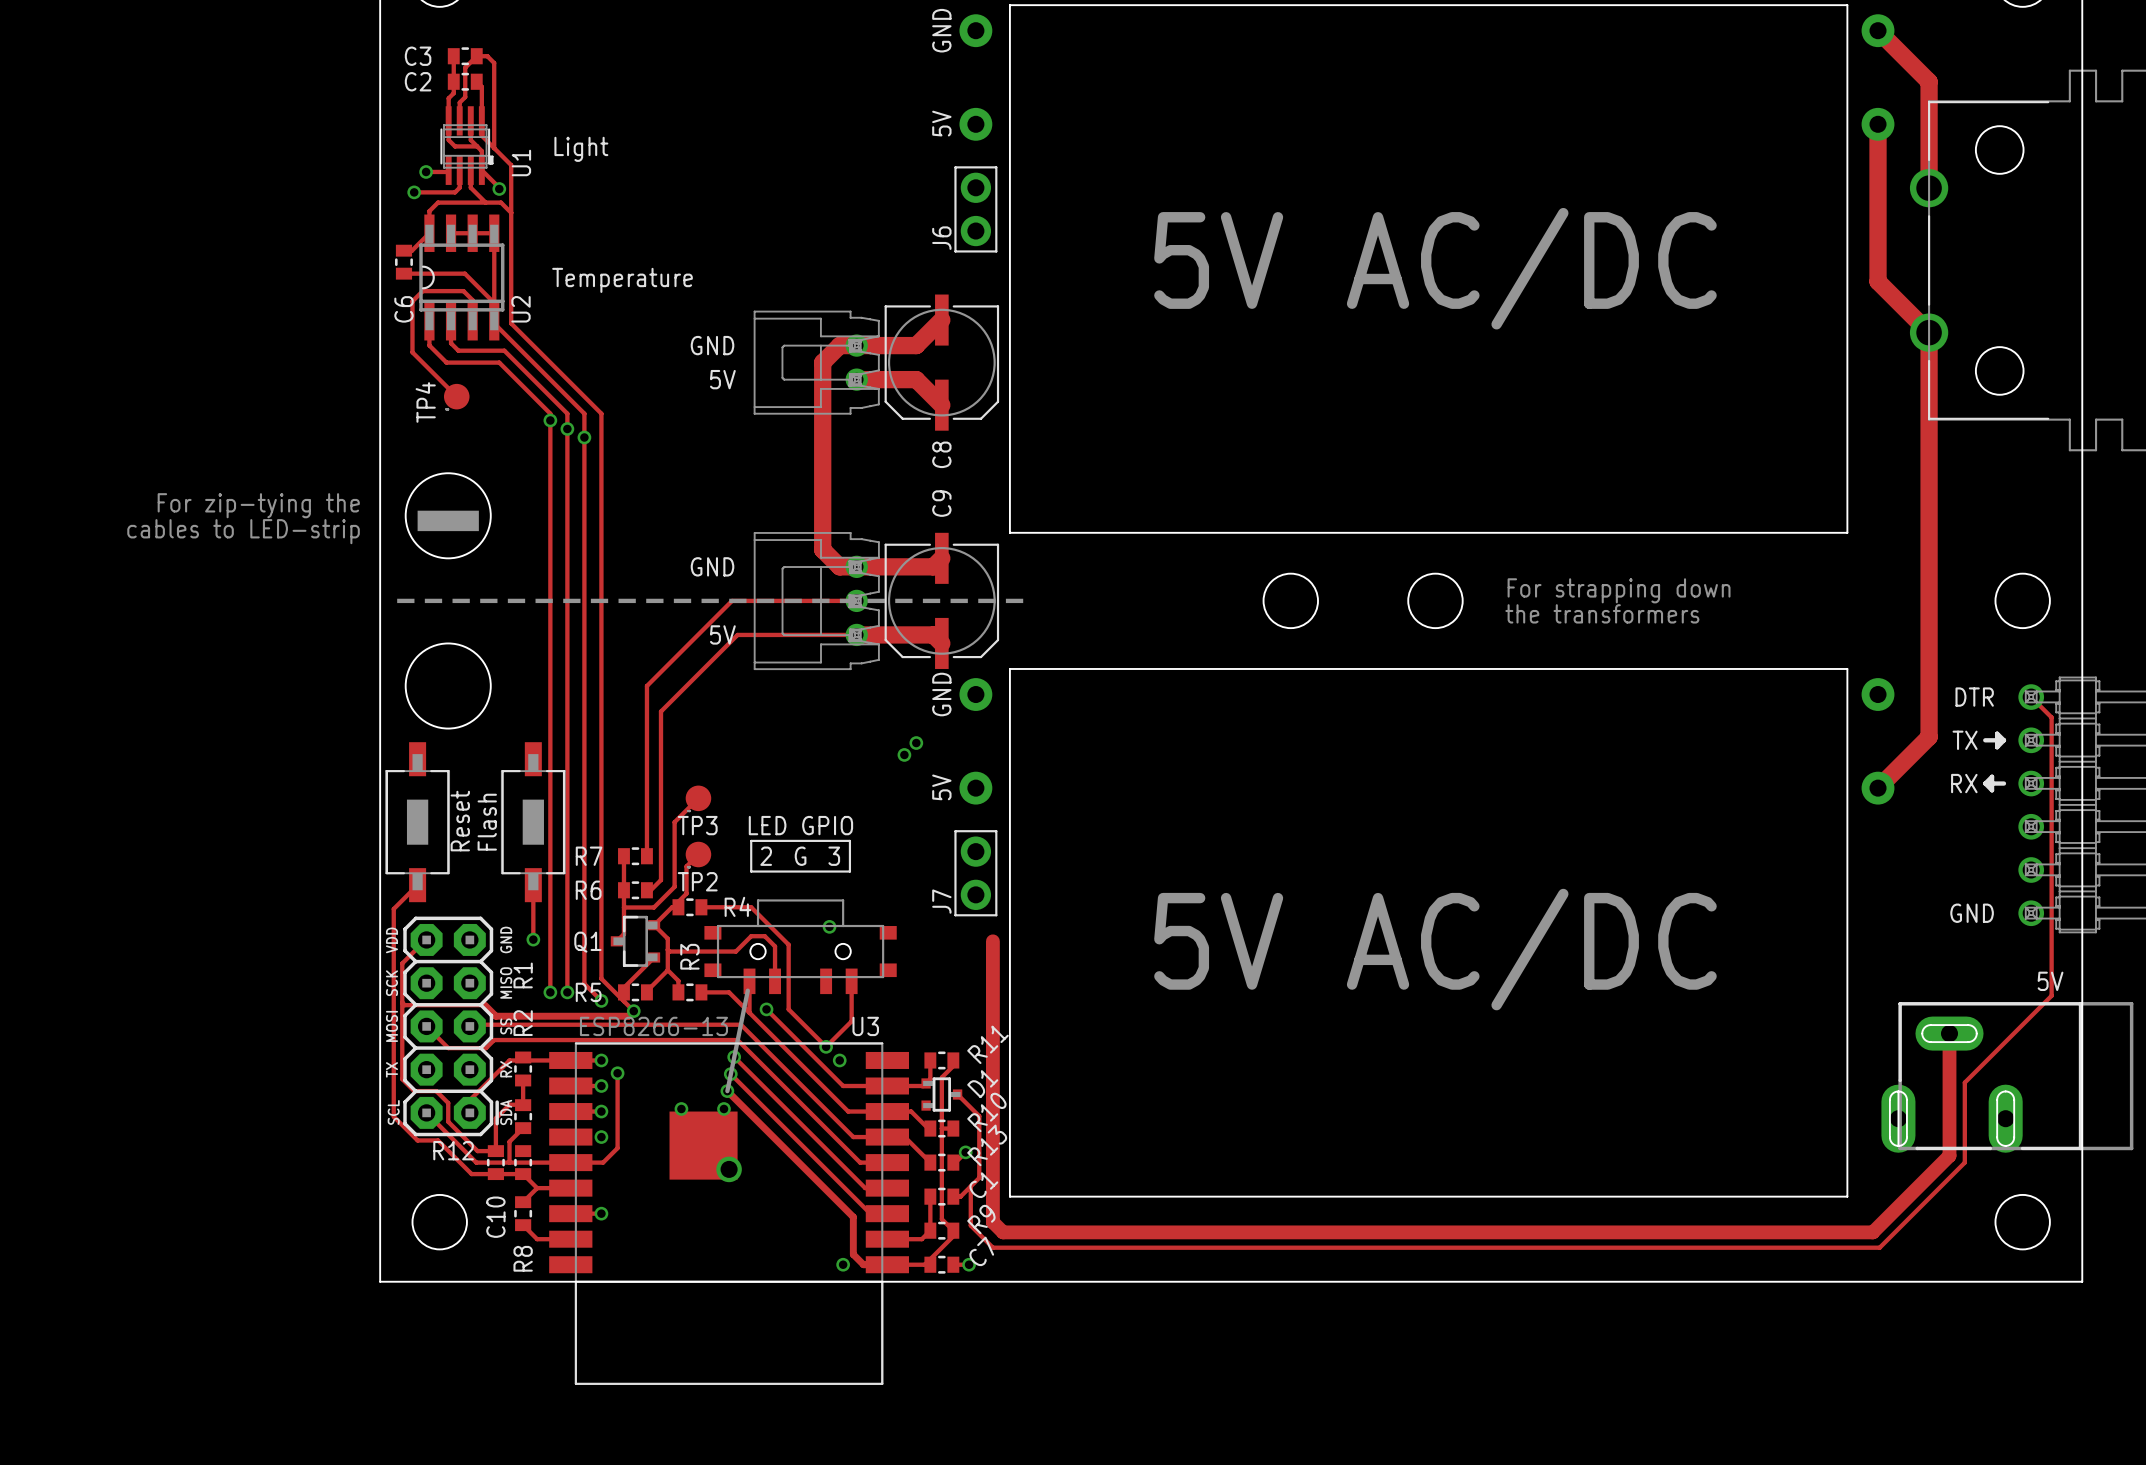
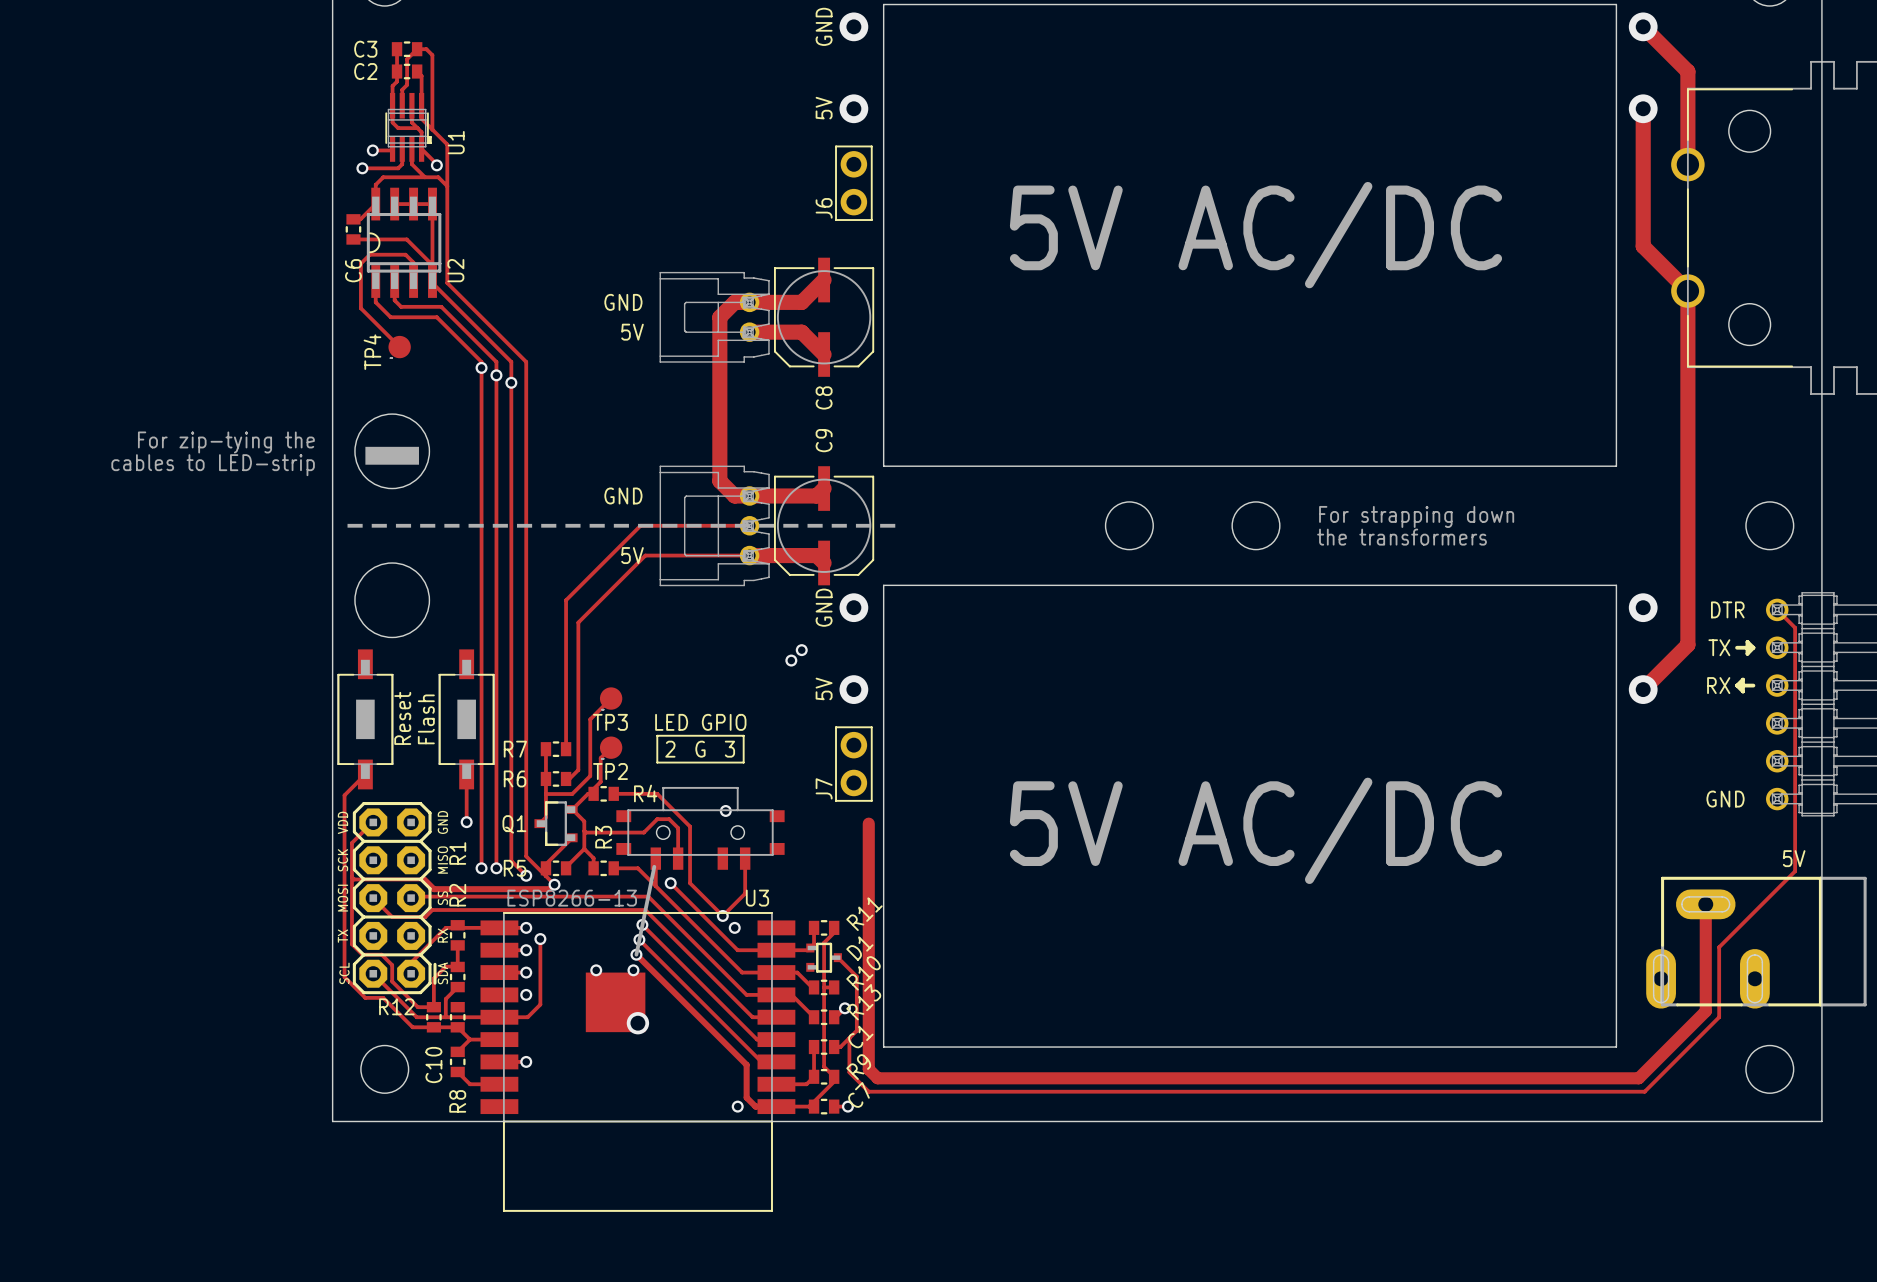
text: Light (581, 149) -> none
text: Temperature (622, 280) -> none

